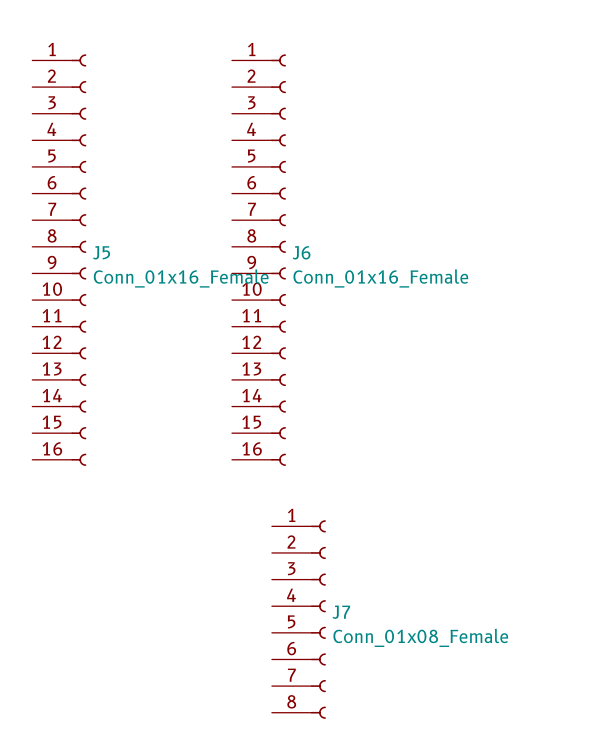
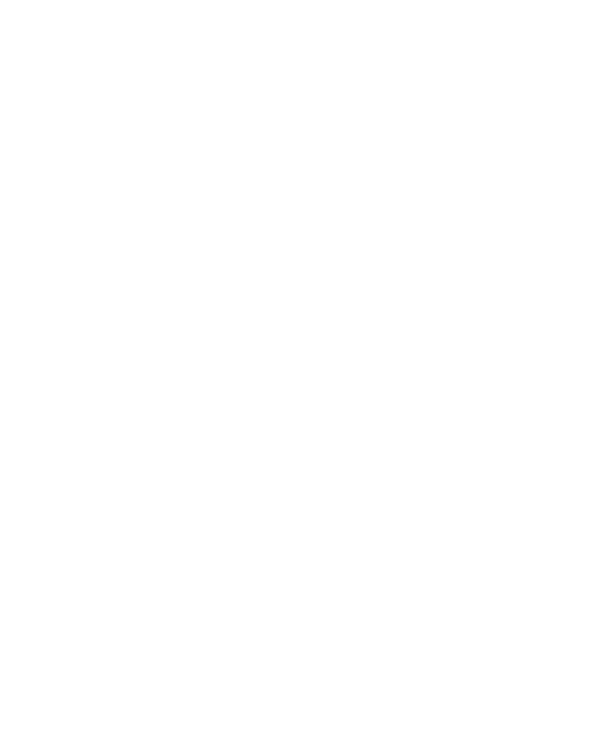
J5: Conn_01x16_Female (59, 260) -> none
J6: Conn_01x16_Female (259, 260) -> none
J7: Conn_01x08_Female (298, 619) -> none

